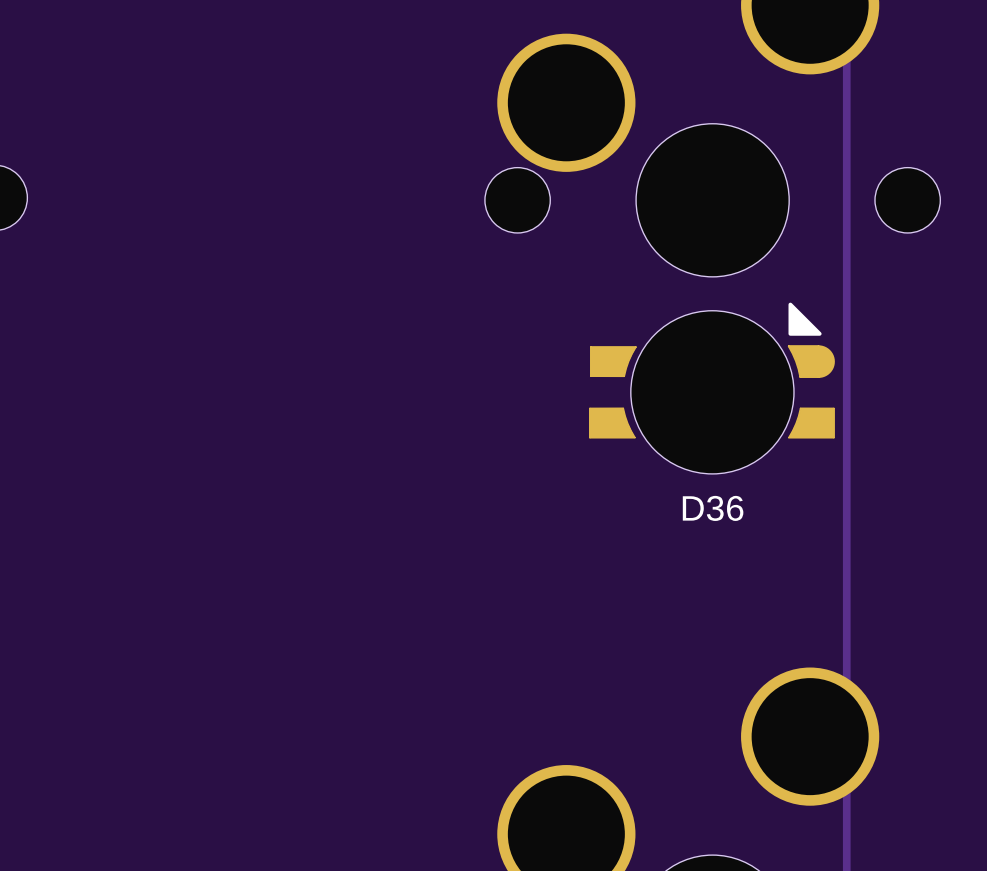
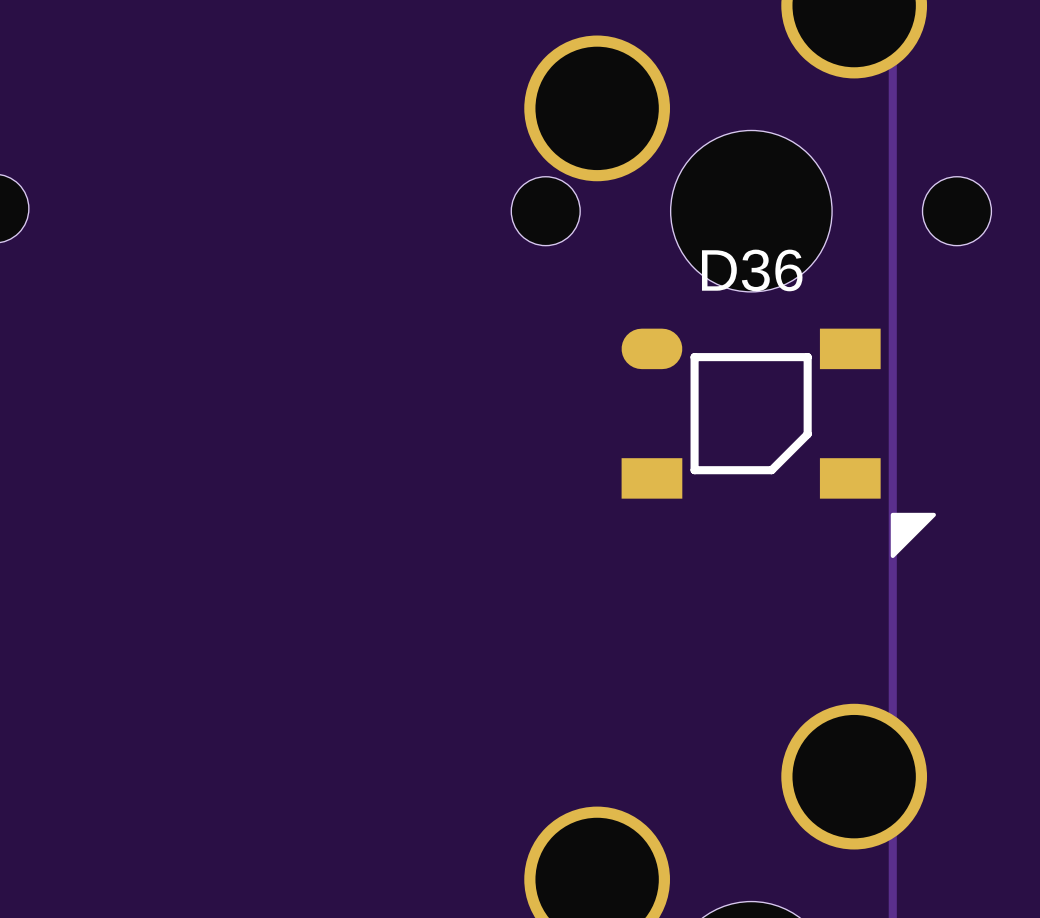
D36: (711, 388) -> none
D36: none -> (778, 443)

